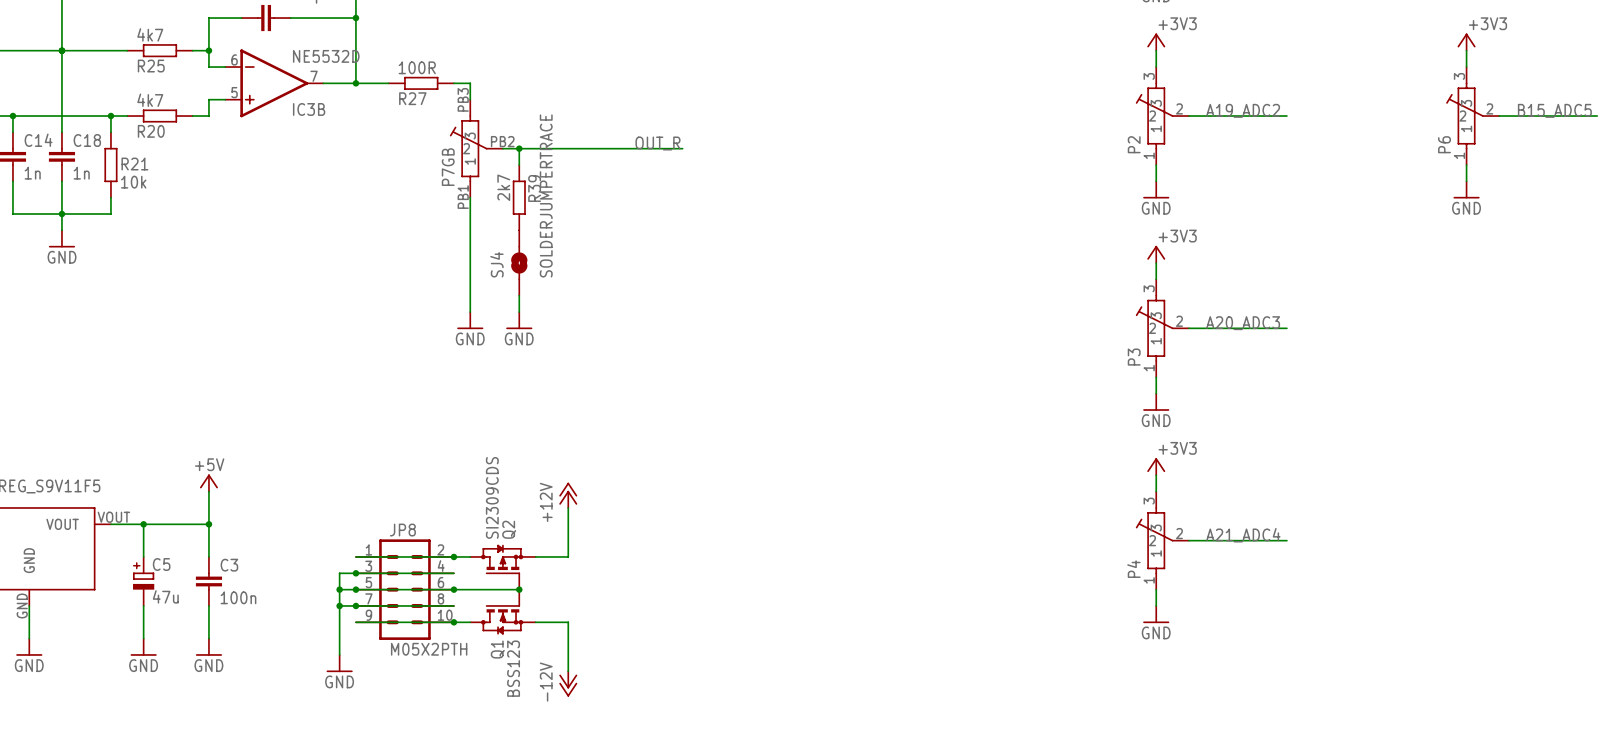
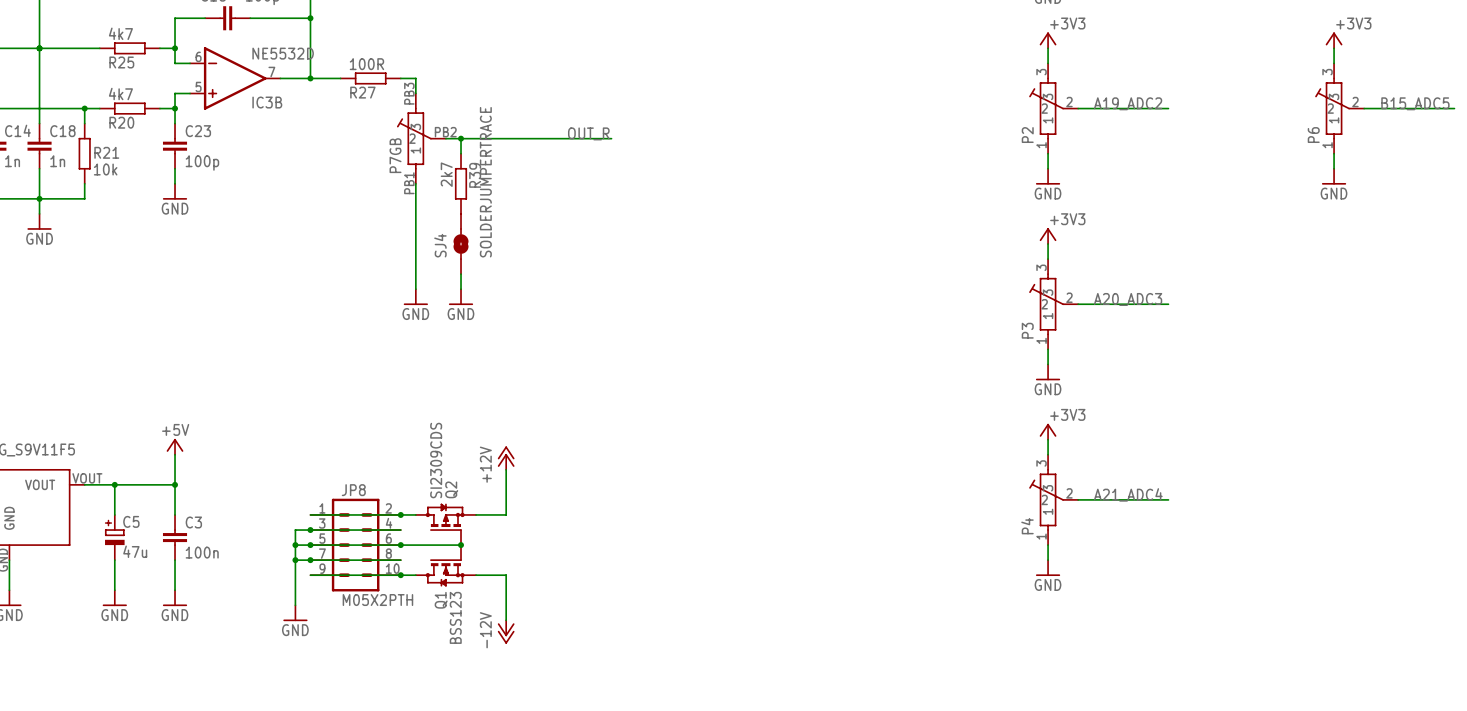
wire: none -> (175, 108) (175, 123)
junction: none -> (175, 108)
C23: none -> 100p (175, 146)
wire: none -> (175, 168) (175, 183)
power symbol: none -> GND (175, 191)

